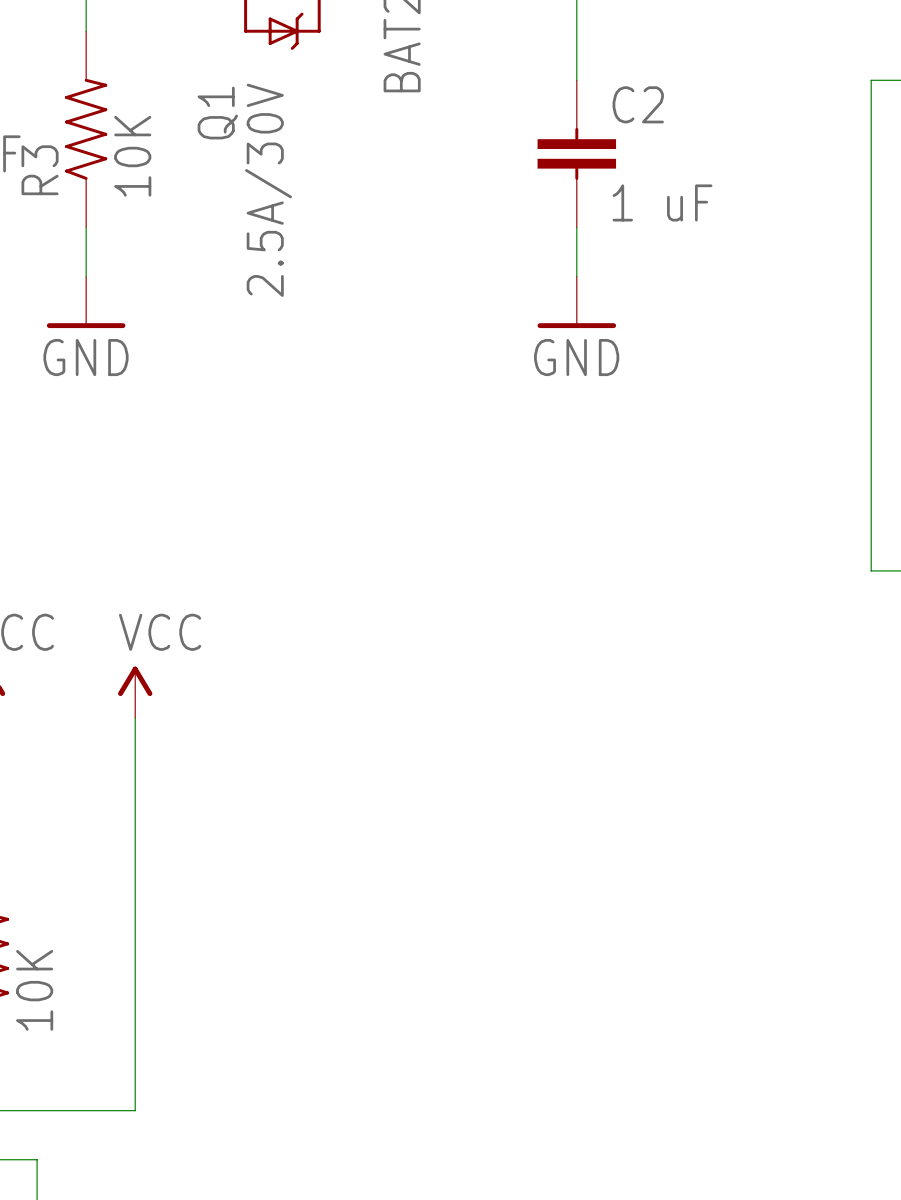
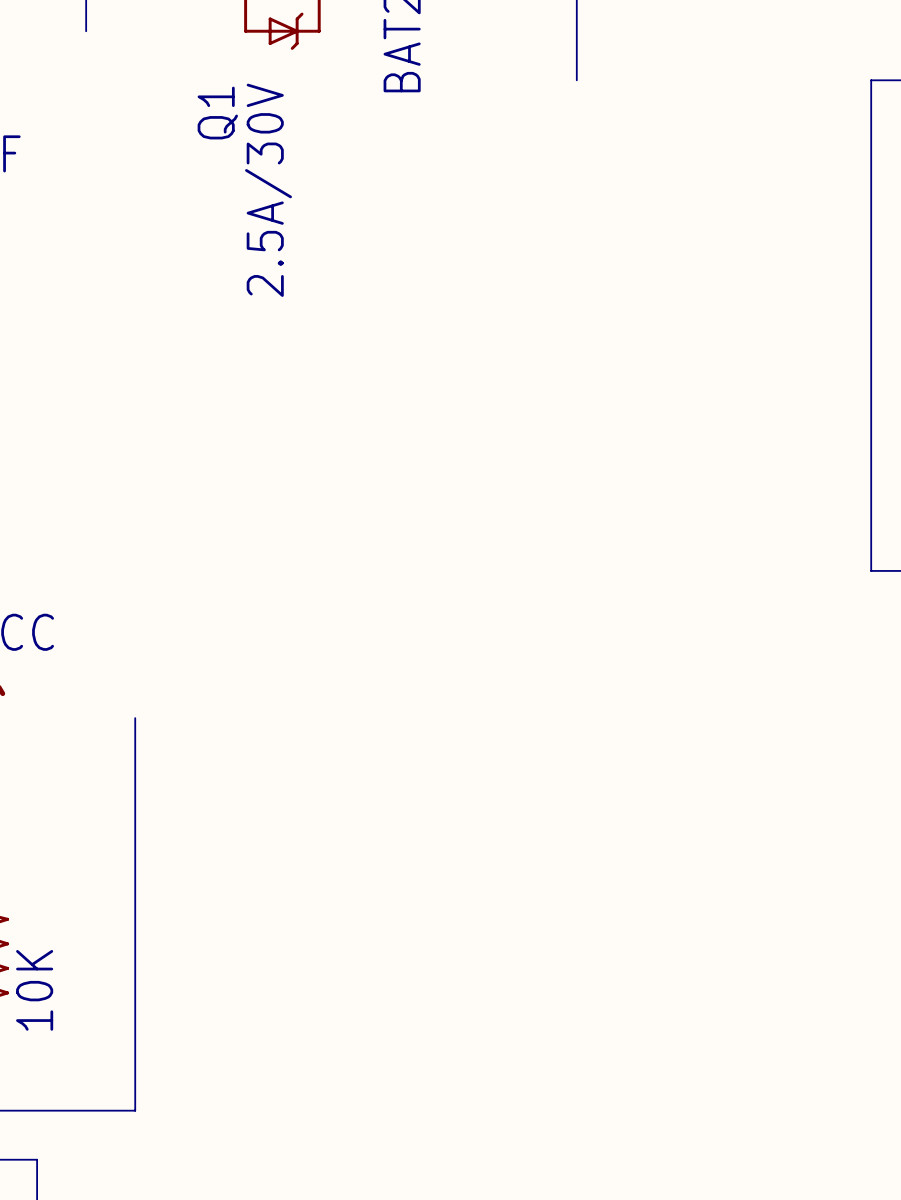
R3: 10K (86, 129) -> none
C2: 1 uF (576, 153) -> none
wire: (86, 227) (86, 276) -> none
wire: (576, 227) (576, 276) -> none
power symbol: GND (86, 302) -> none
power symbol: GND (576, 302) -> none
power symbol: VCC (135, 692) -> none

